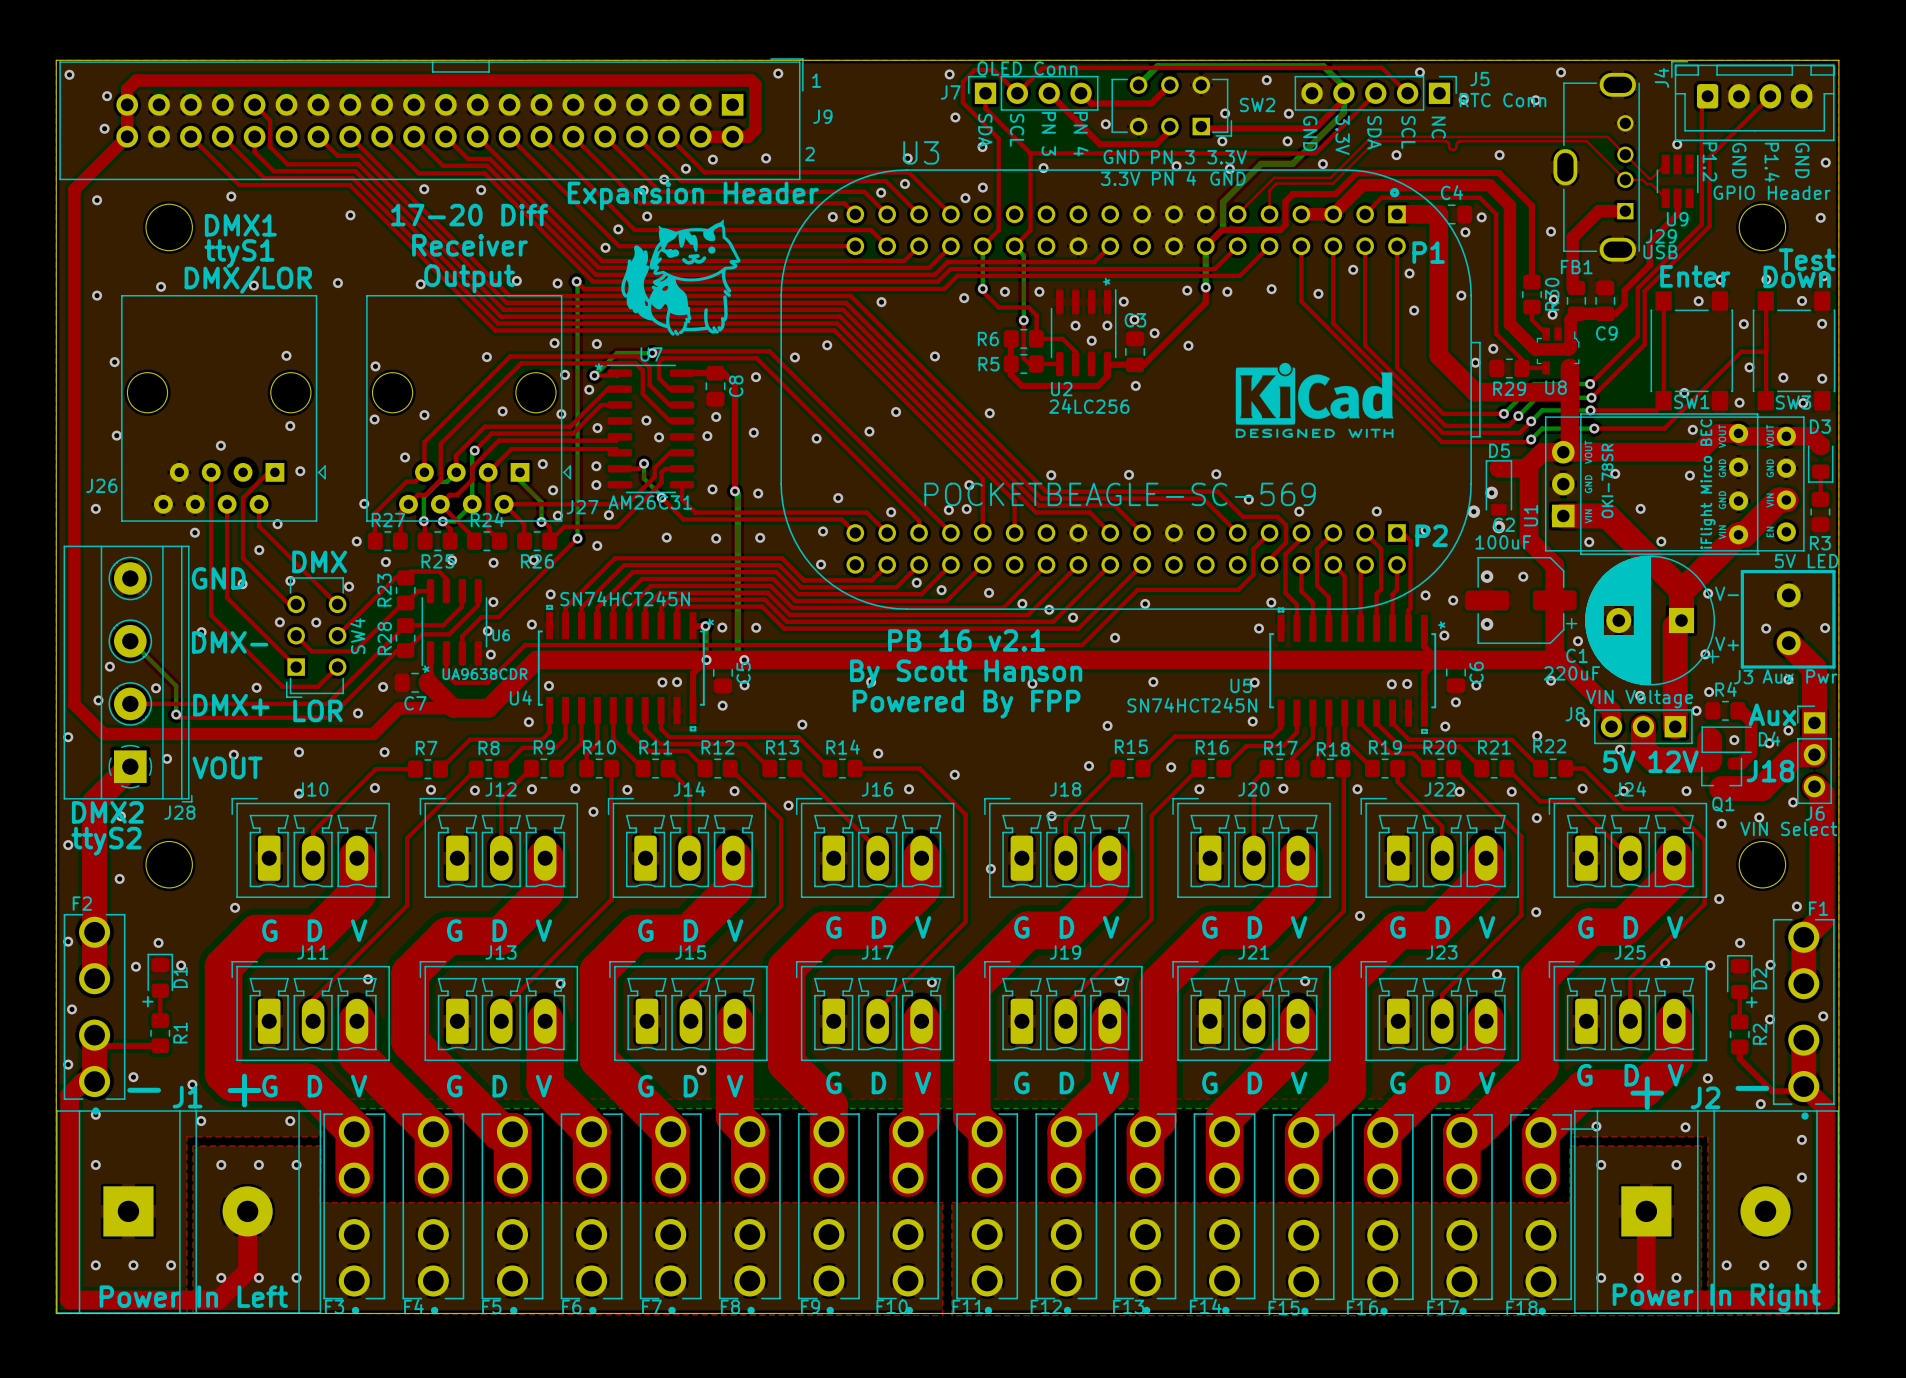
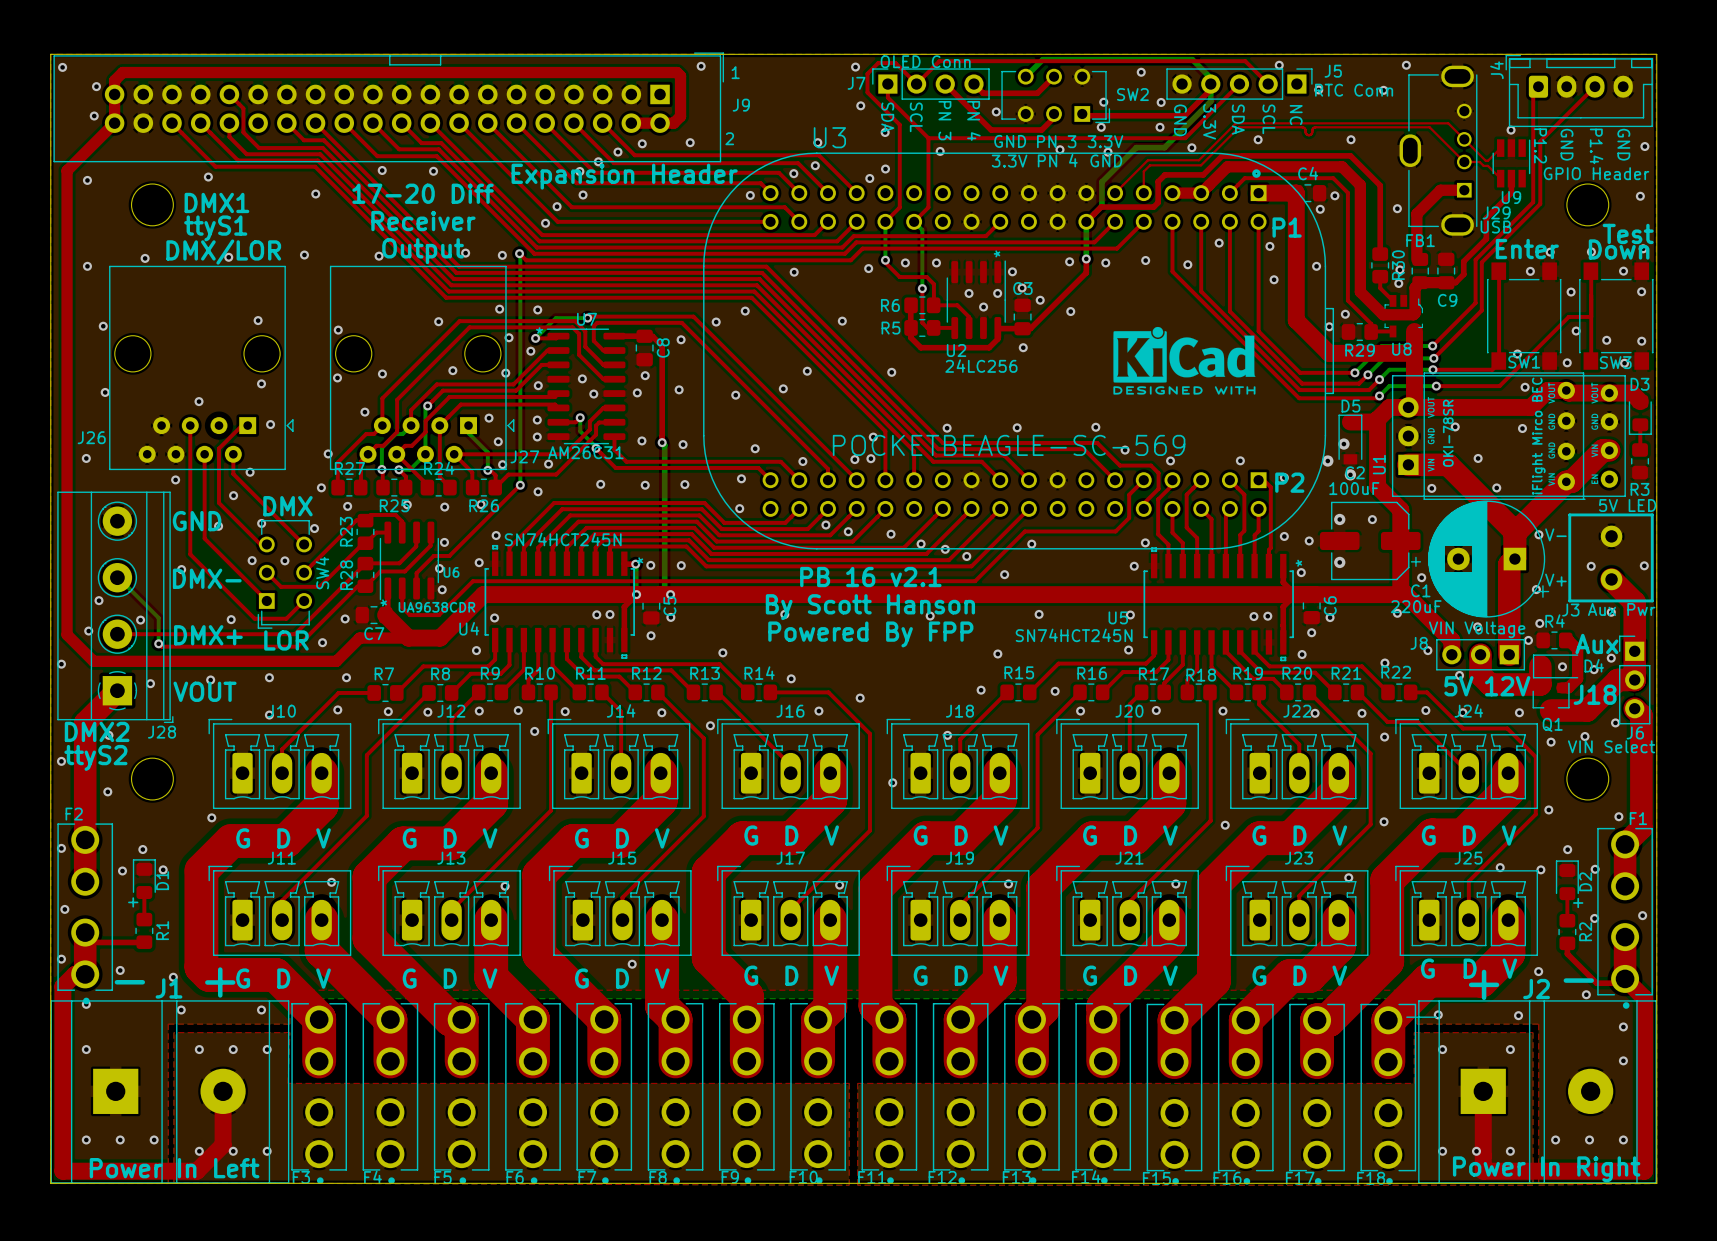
drawing: [621, 219, 741, 336] -> none

